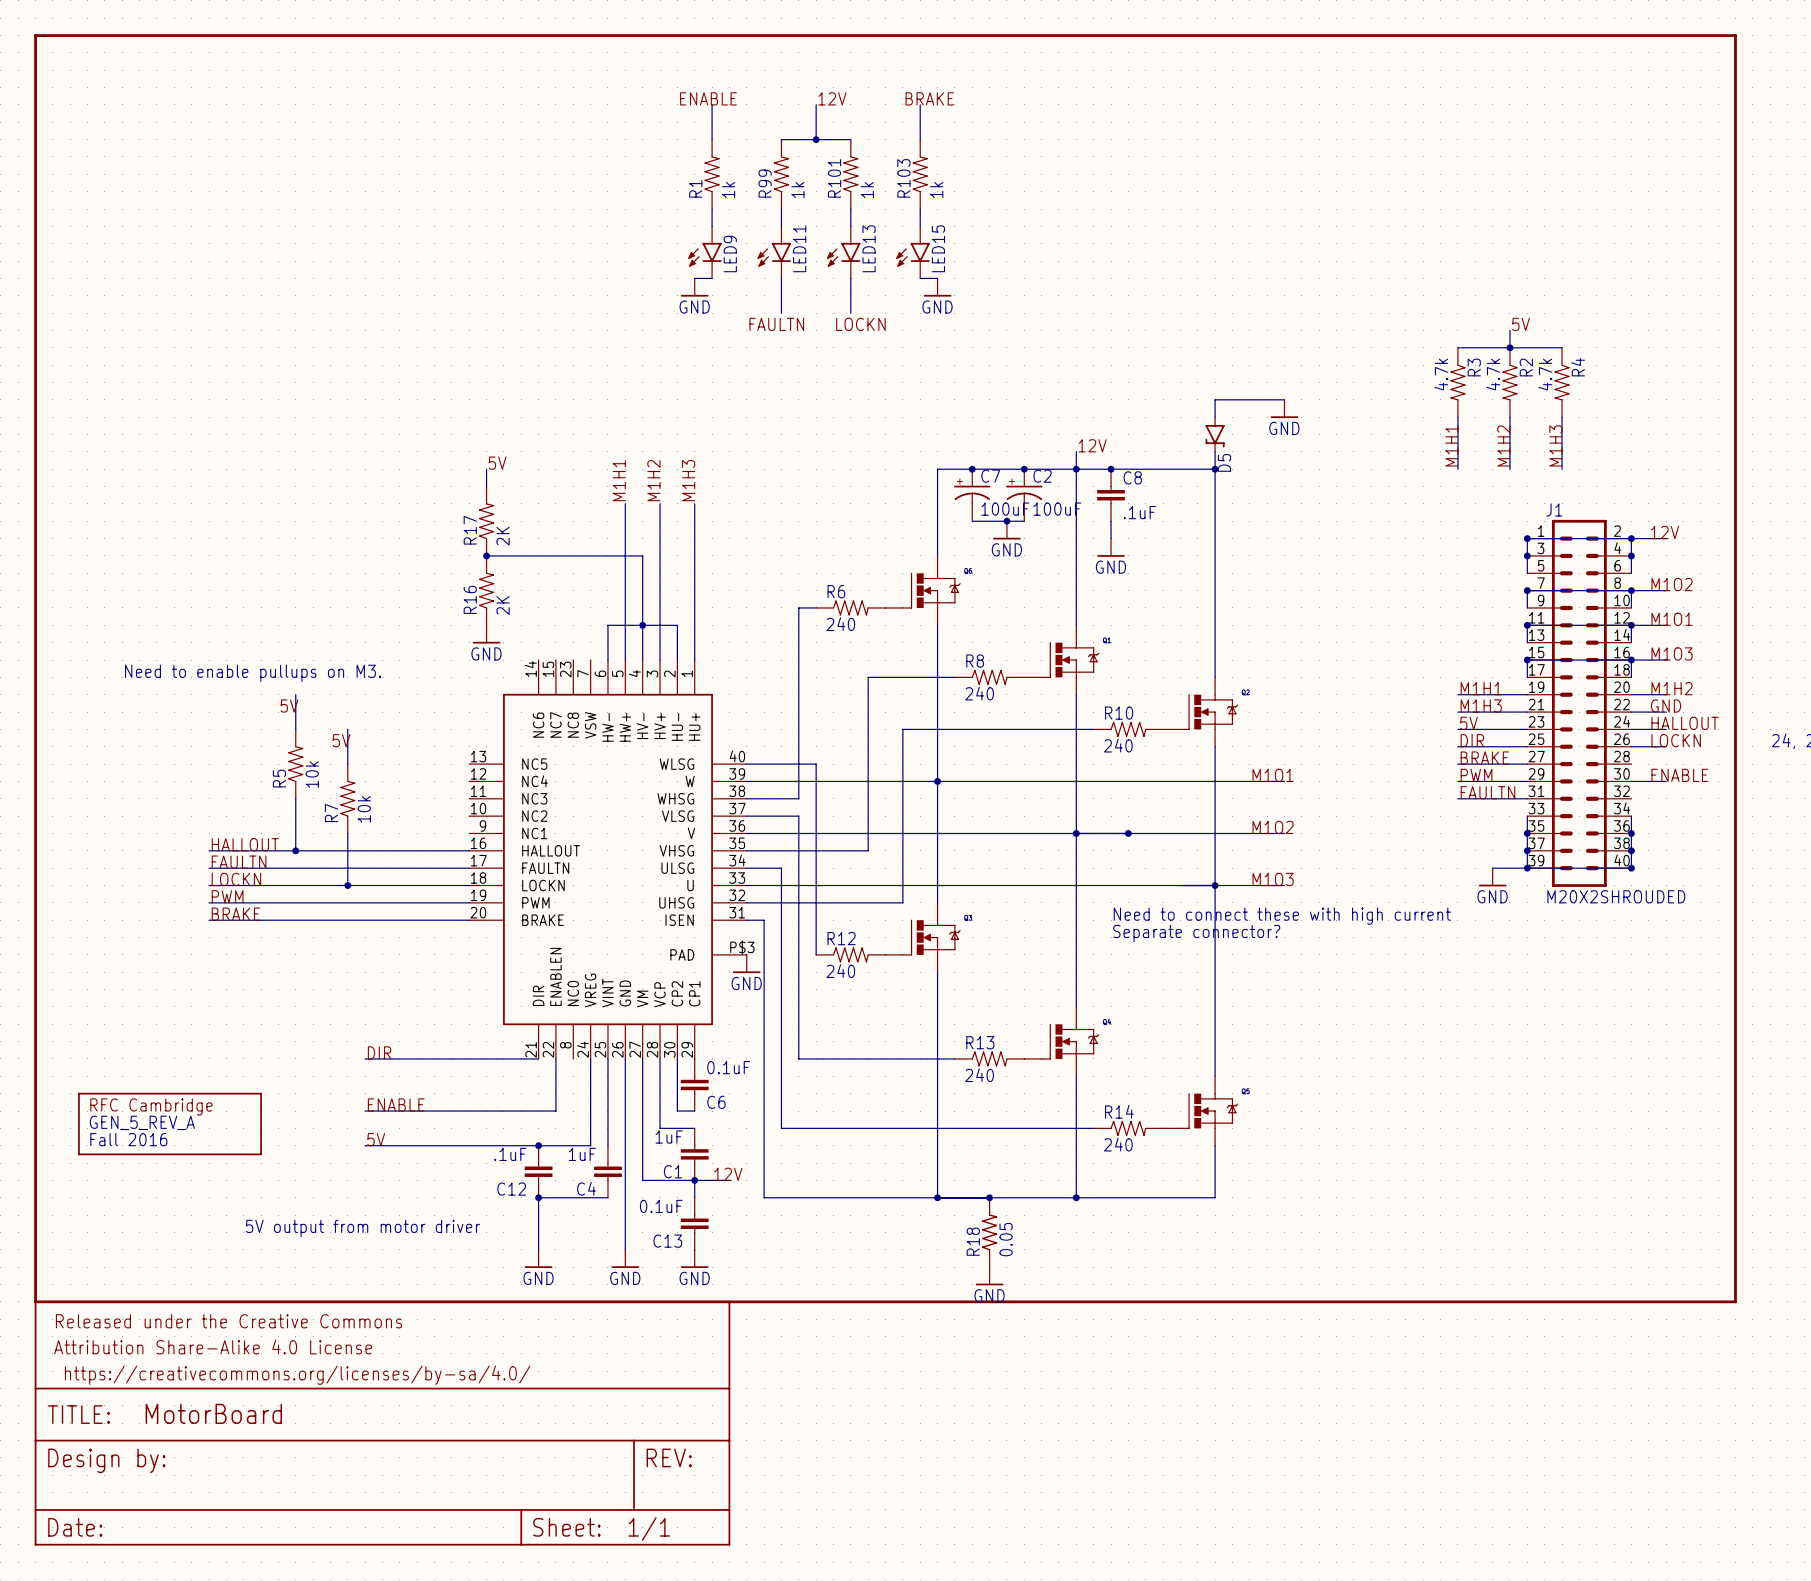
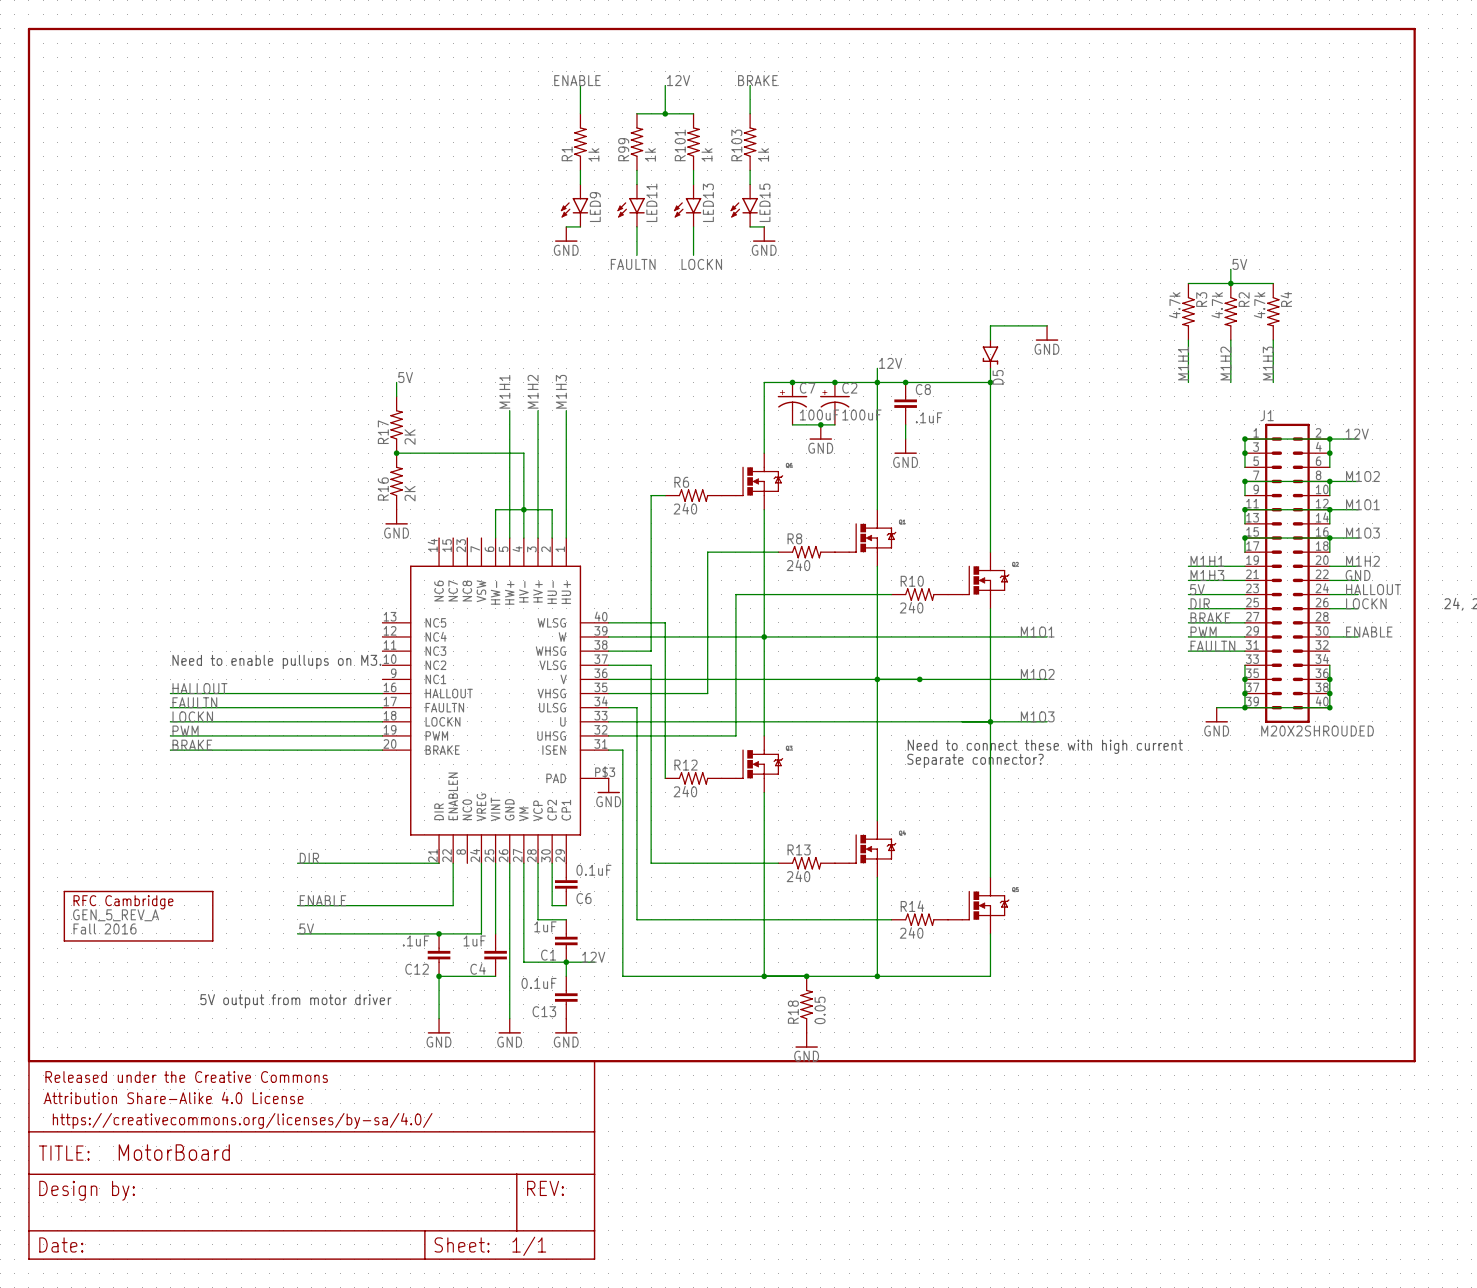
text position: Need to enable pullups on M3. (253, 673) -> Need to enable pullups on M3. (276, 661)
wire: (295, 694) (295, 729) -> none
label: 5V (289, 705) -> none
wire: (347, 729) (347, 764) -> none
label: 5V (341, 740) -> none
R5: 10k (295, 764) -> none
wire: (295, 798) (295, 850) -> none
R7: 10k (347, 798) -> none
wire: (347, 833) (347, 885) -> none
junction: (295, 850) -> none
junction: (347, 885) -> none

